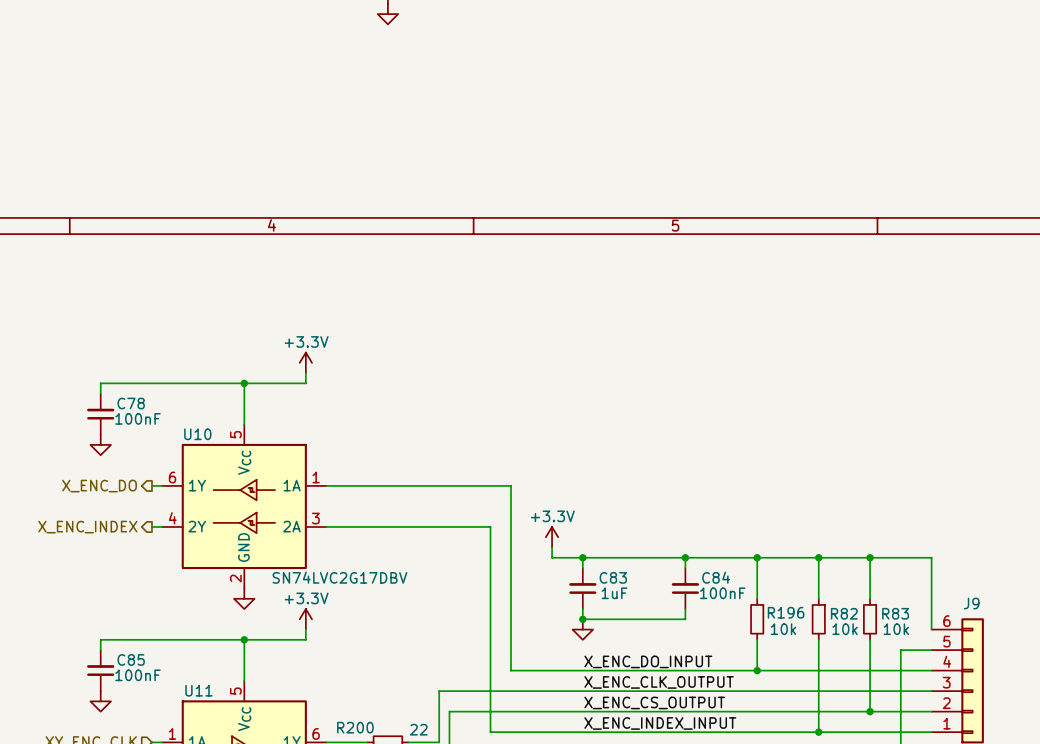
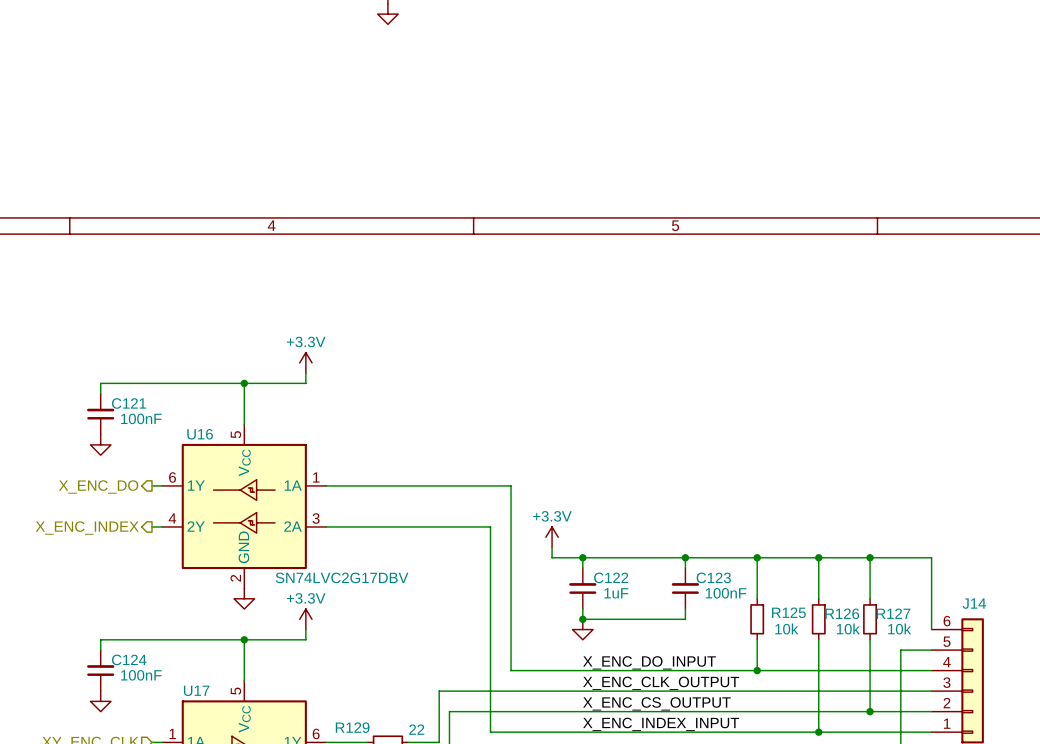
C78 name: C78 (131, 403) -> C121 (129, 403)
U10 name: U10 (197, 434) -> U16 (200, 434)
C83 name: C83 (613, 577) -> C122 (611, 577)
C84 name: C84 (716, 577) -> C123 (713, 577)
J9 name: J9 (971, 603) -> J14 (974, 603)
R196 name: R196 (786, 612) -> R125 (788, 612)
R82 name: R82 (844, 613) -> R126 (842, 613)
R83 name: R83 (895, 613) -> R127 (893, 613)
C85 name: C85 (131, 659) -> C124 (129, 659)
U11 name: U11 (198, 690) -> U17 (196, 690)
R200 name: R200 (355, 727) -> R129 (352, 727)

